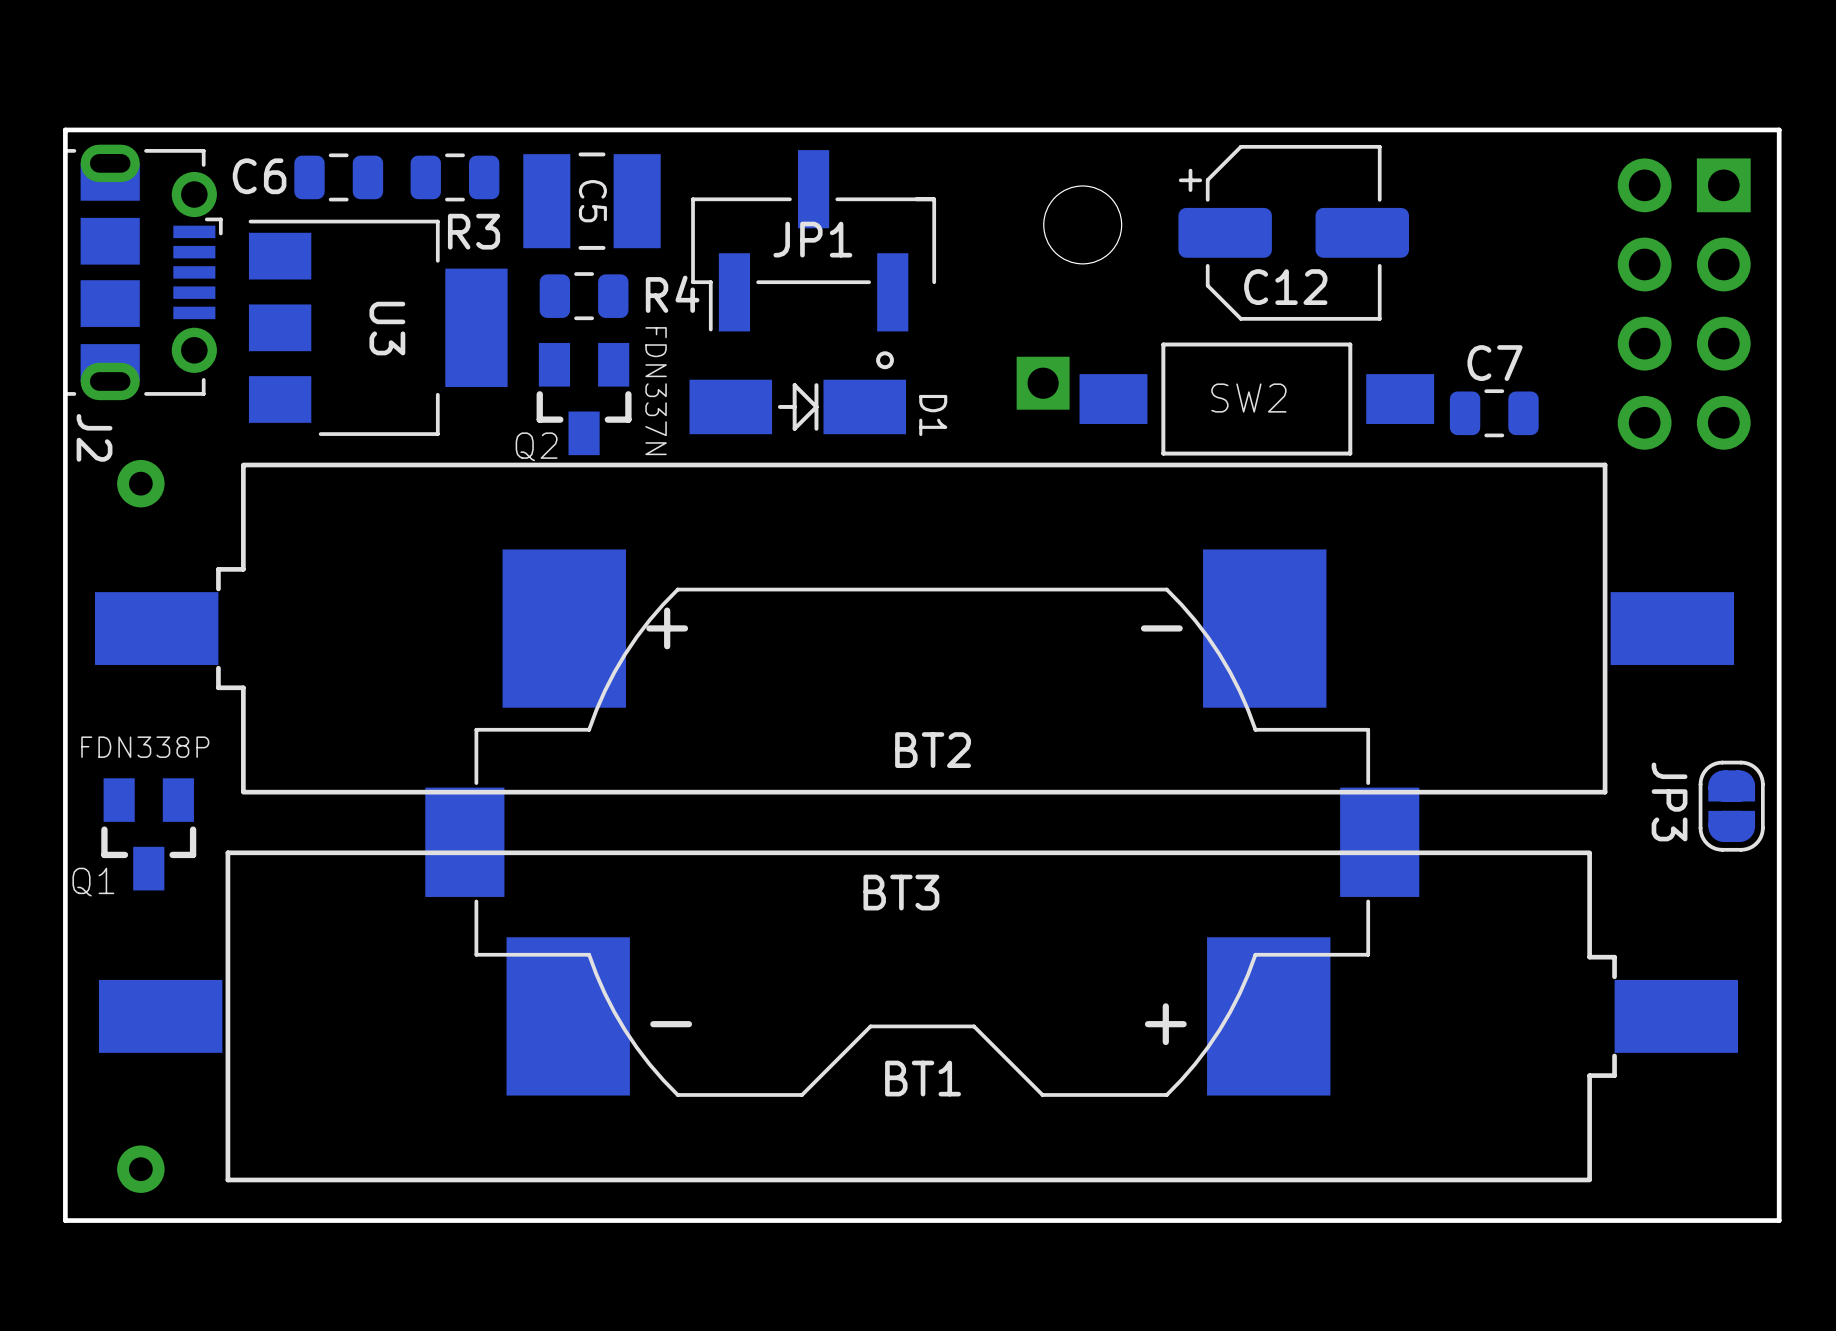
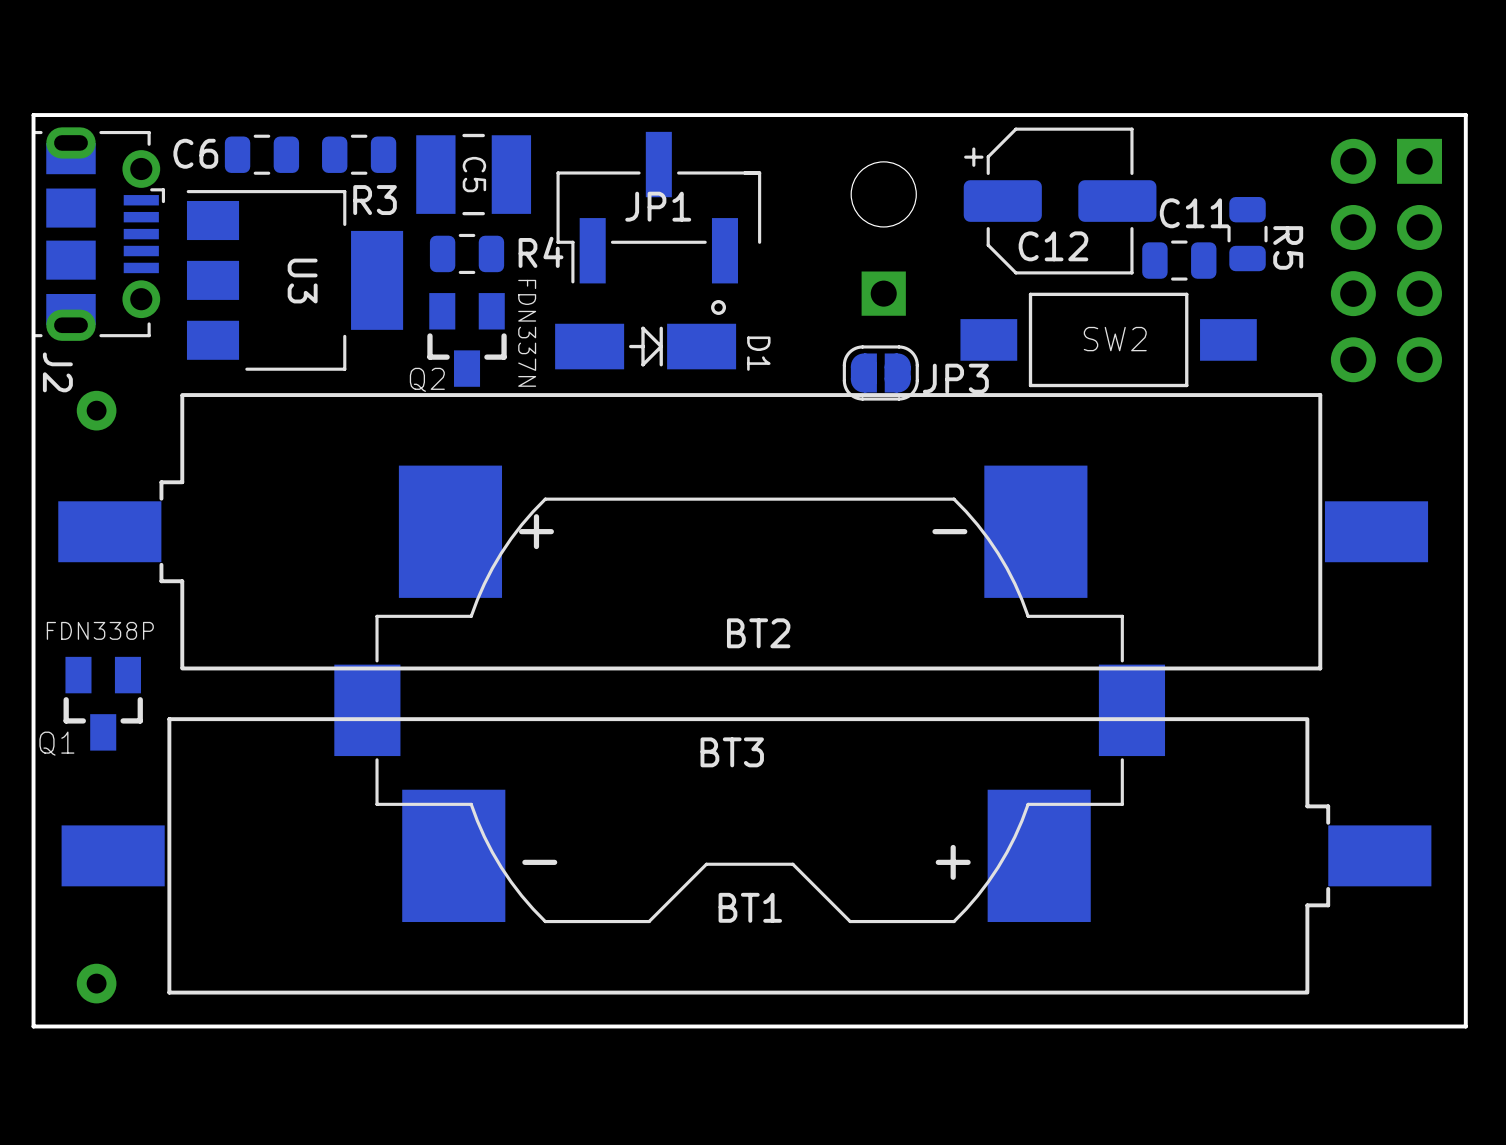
R5: none -> (1247, 234)
C11: none -> (1179, 260)
part position: (1043, 383) -> (883, 293)
SW2 name position: SW2 (1248, 398) -> SW2 (1115, 339)
SW2 position: (1256, 399) -> (1108, 339)
C7: (1494, 413) -> none
JP3 name position: JP3 (1669, 801) -> JP3 (955, 378)
JP3 rotation: 0° (1731, 806) -> 90° clockwise (880, 373)
JP3 position: (1731, 806) -> (880, 373)

